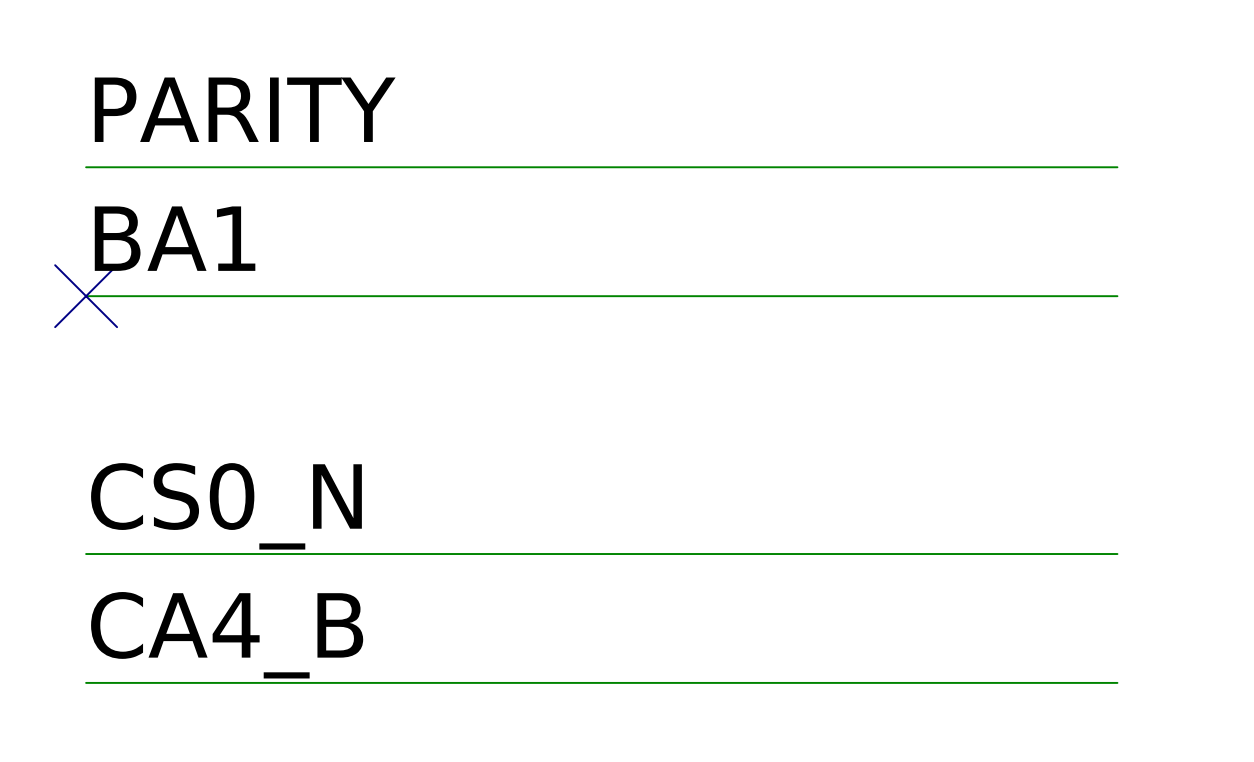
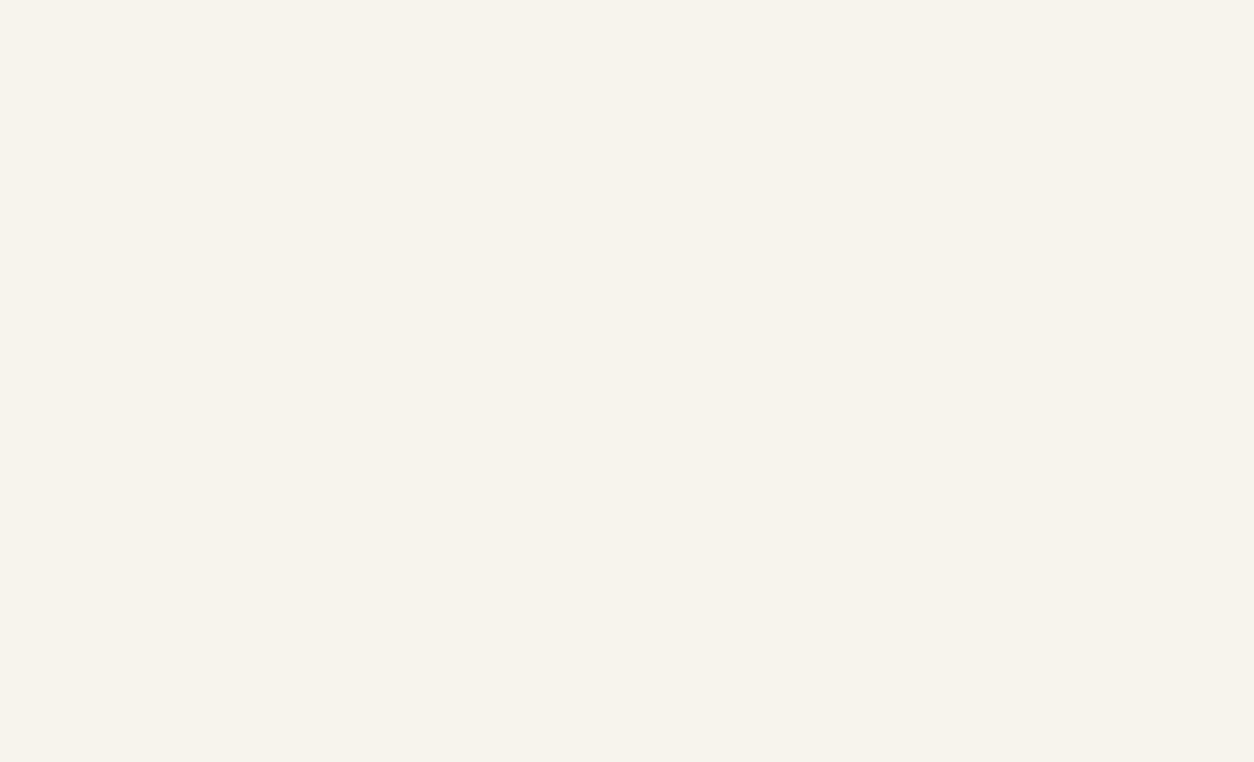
label: PARITY (245, 109) -> none
wire: (86, 167) (1117, 167) -> none
label: BA1 (175, 238) -> none
wire: (86, 296) (1117, 296) -> none
no-connect mark: (86, 296) -> none
label: CS0_N (226, 506) -> none
wire: (86, 554) (1117, 554) -> none
label: CA4_B (227, 635) -> none
wire: (86, 682) (1117, 682) -> none

